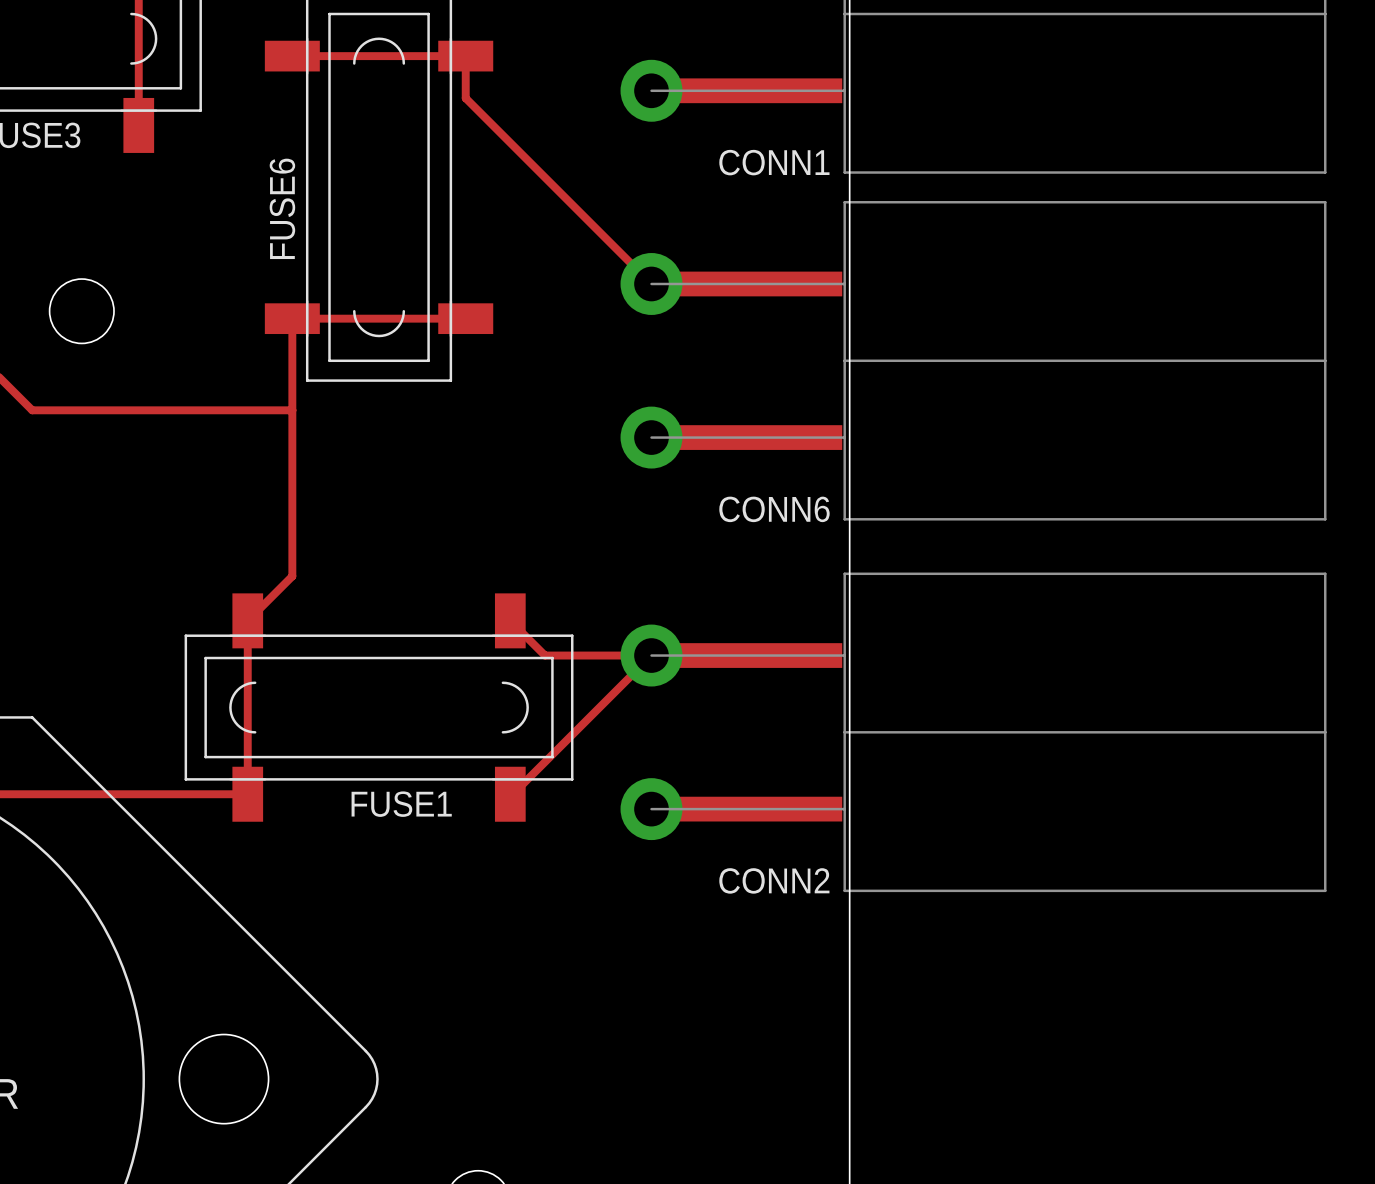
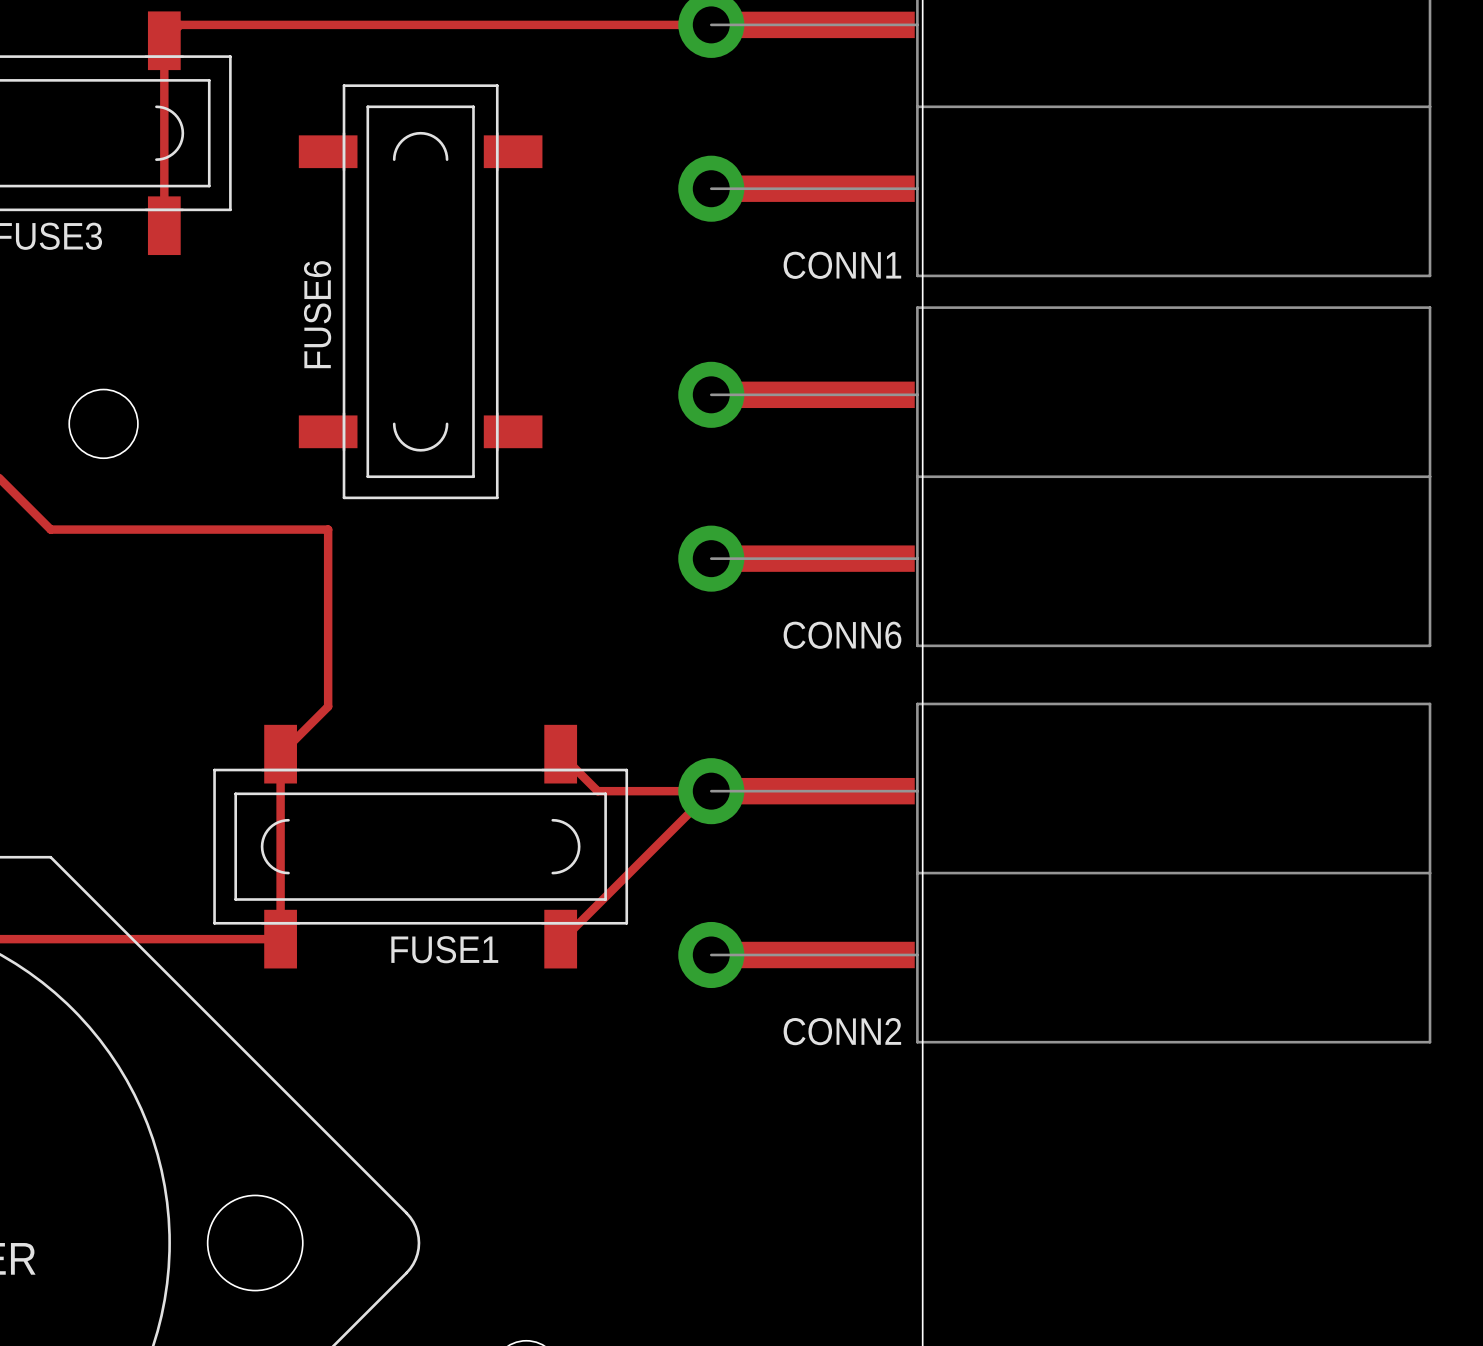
track: (292, 56) (465, 56) (465, 98) (651, 283) (755, 283) -> none
track: (465, 318) (292, 318) (292, 410) -> none

